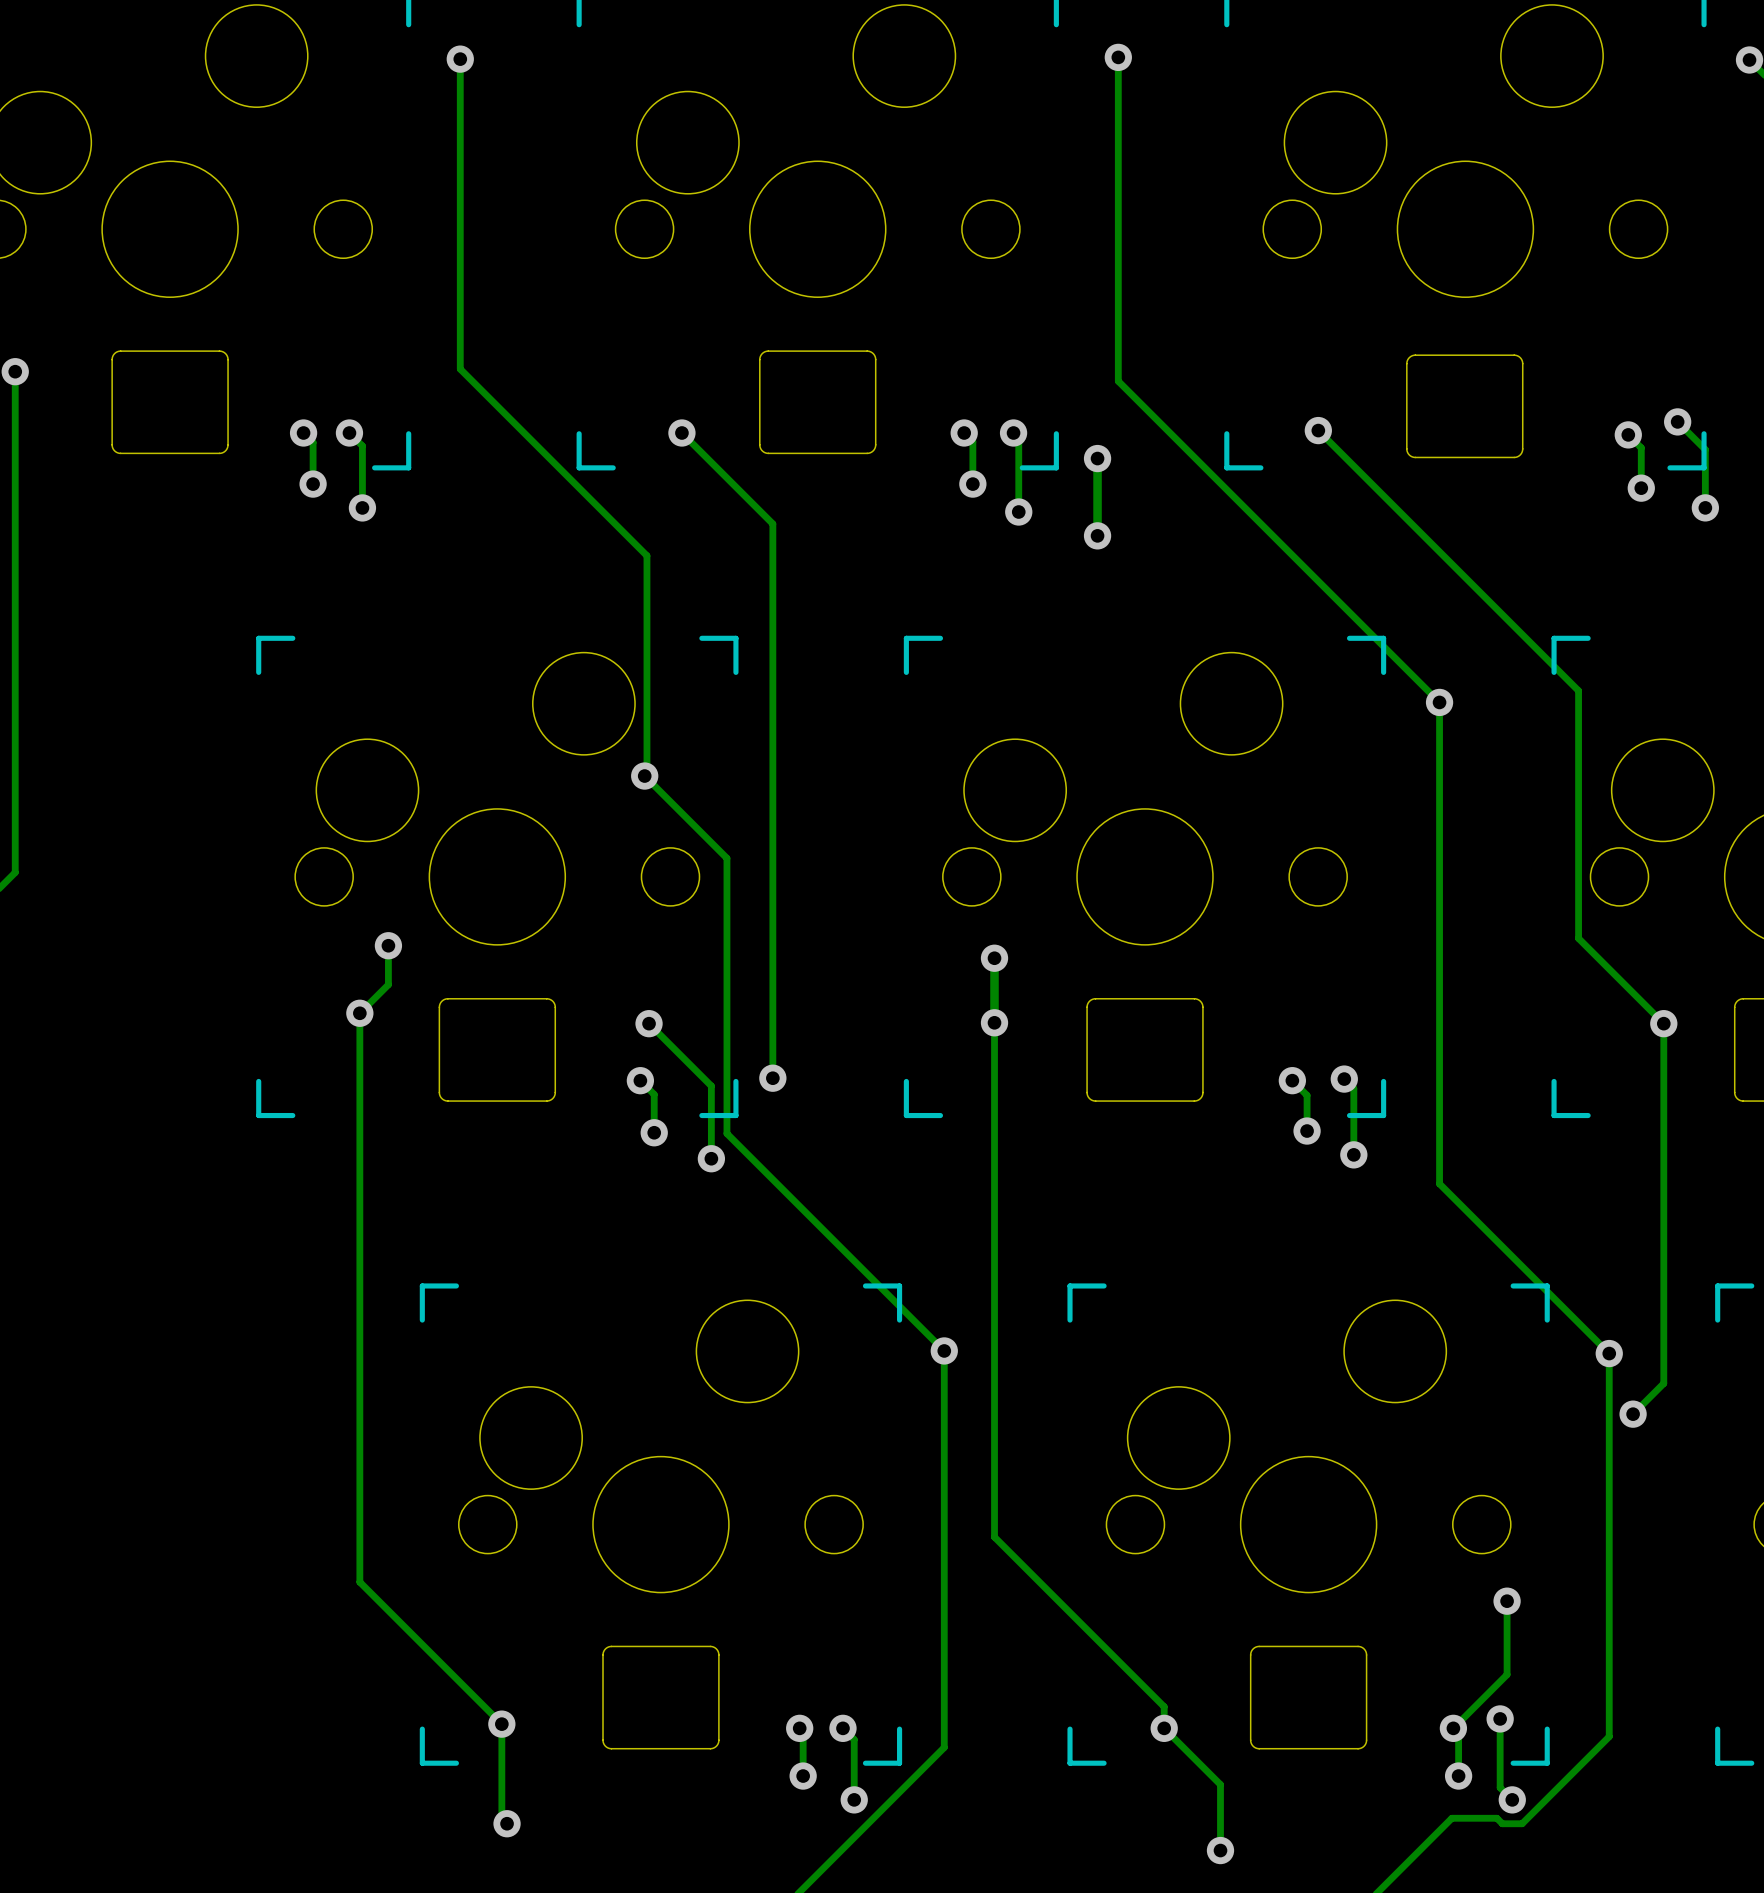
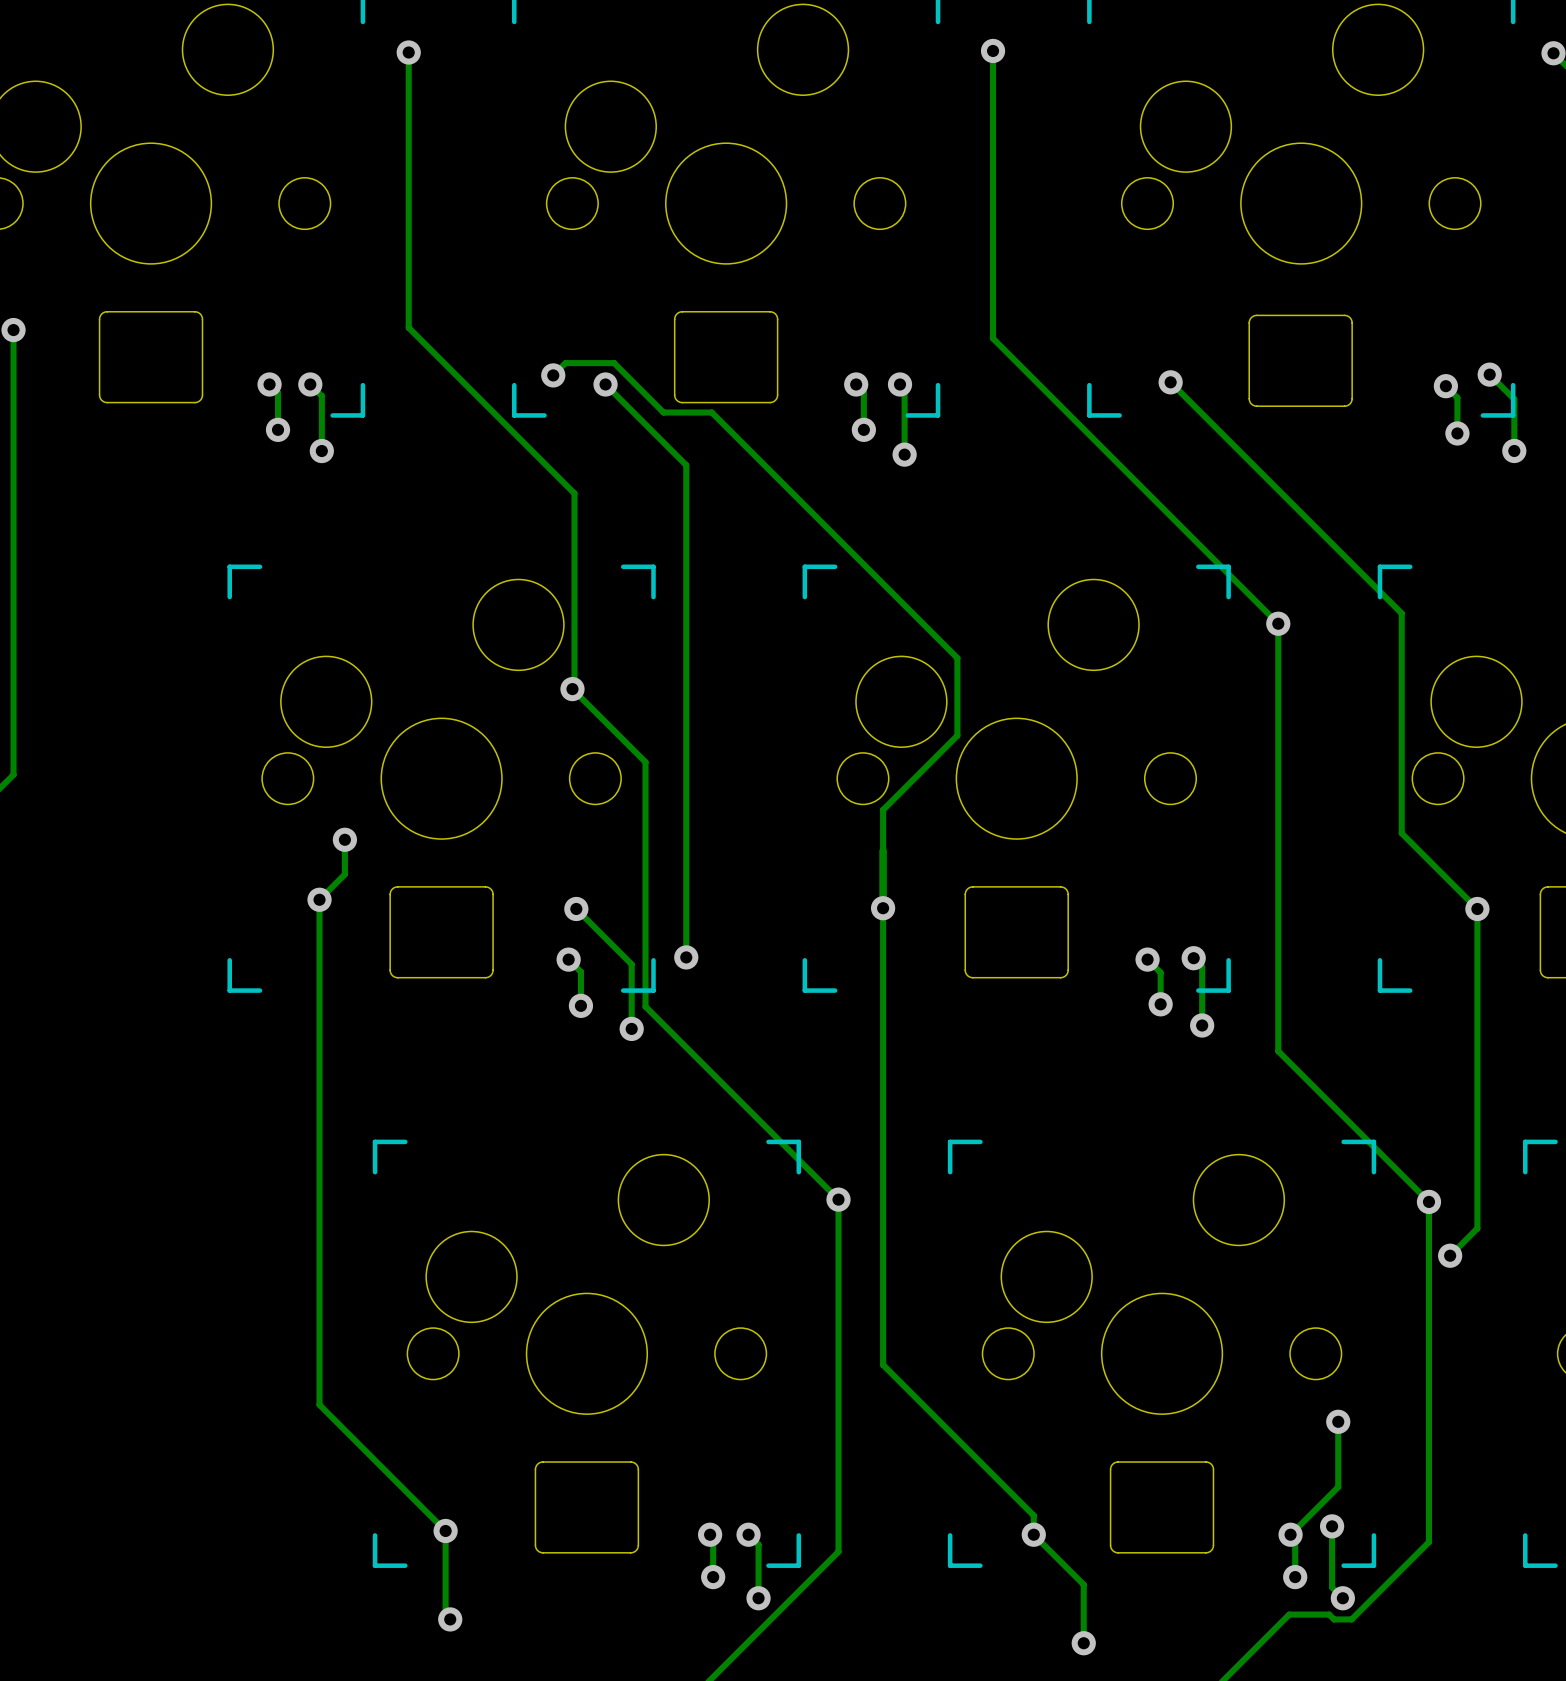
track: none -> (553, 375) (565, 363) (614, 363) (663, 412) (711, 412) (957, 658) (957, 735) (883, 809) (883, 850)
via: none -> (553, 375)
track: (1097, 458) (1097, 535) -> none
via: (1097, 458) -> none
via: (1097, 535) -> none
via: (994, 958) -> none

